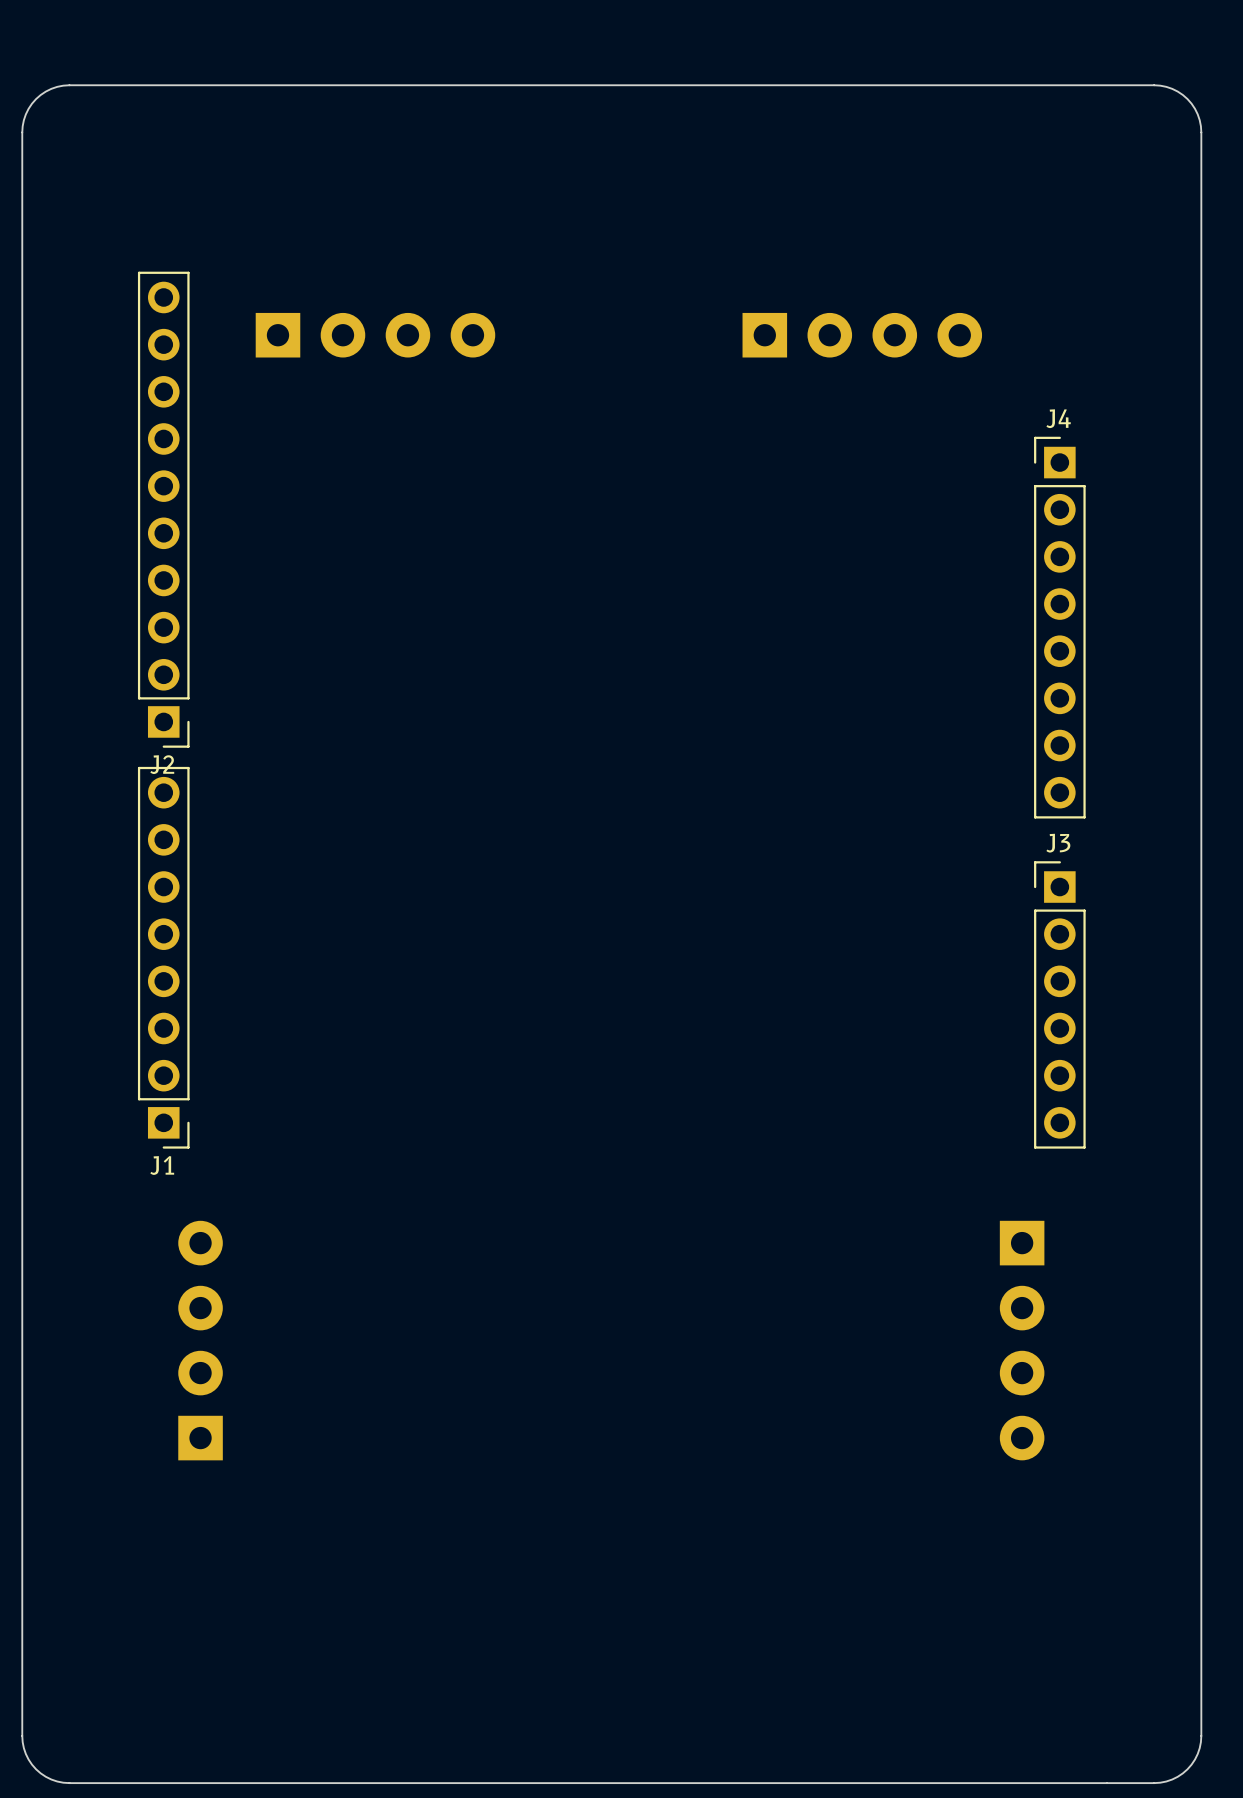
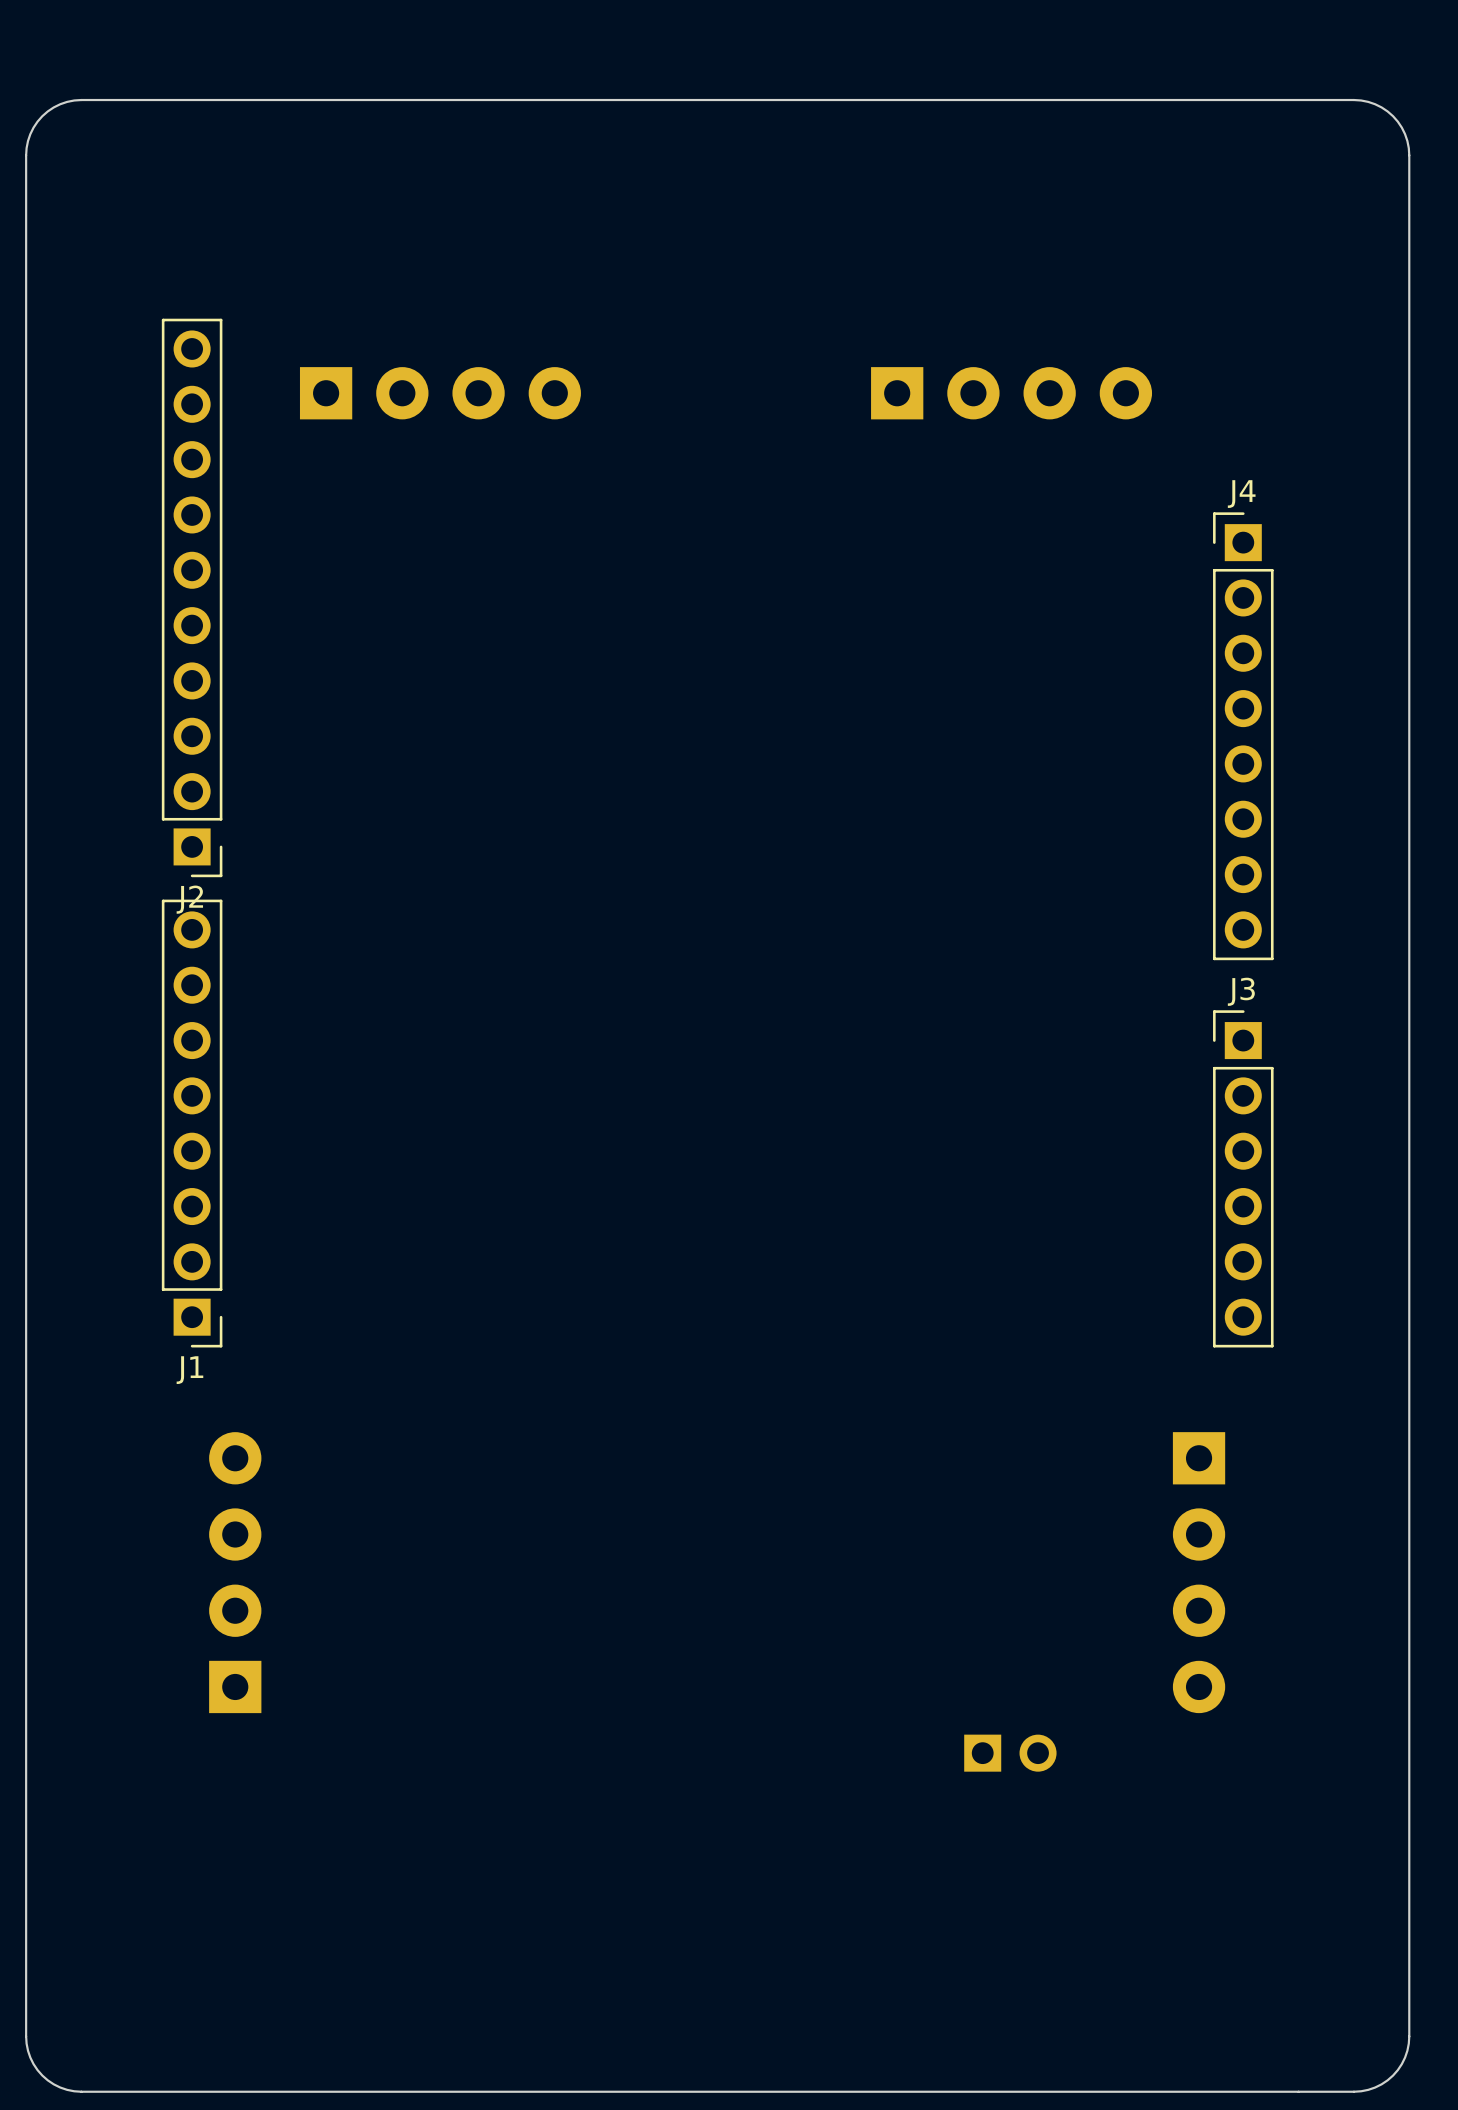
part: none -> (1010, 1753)

